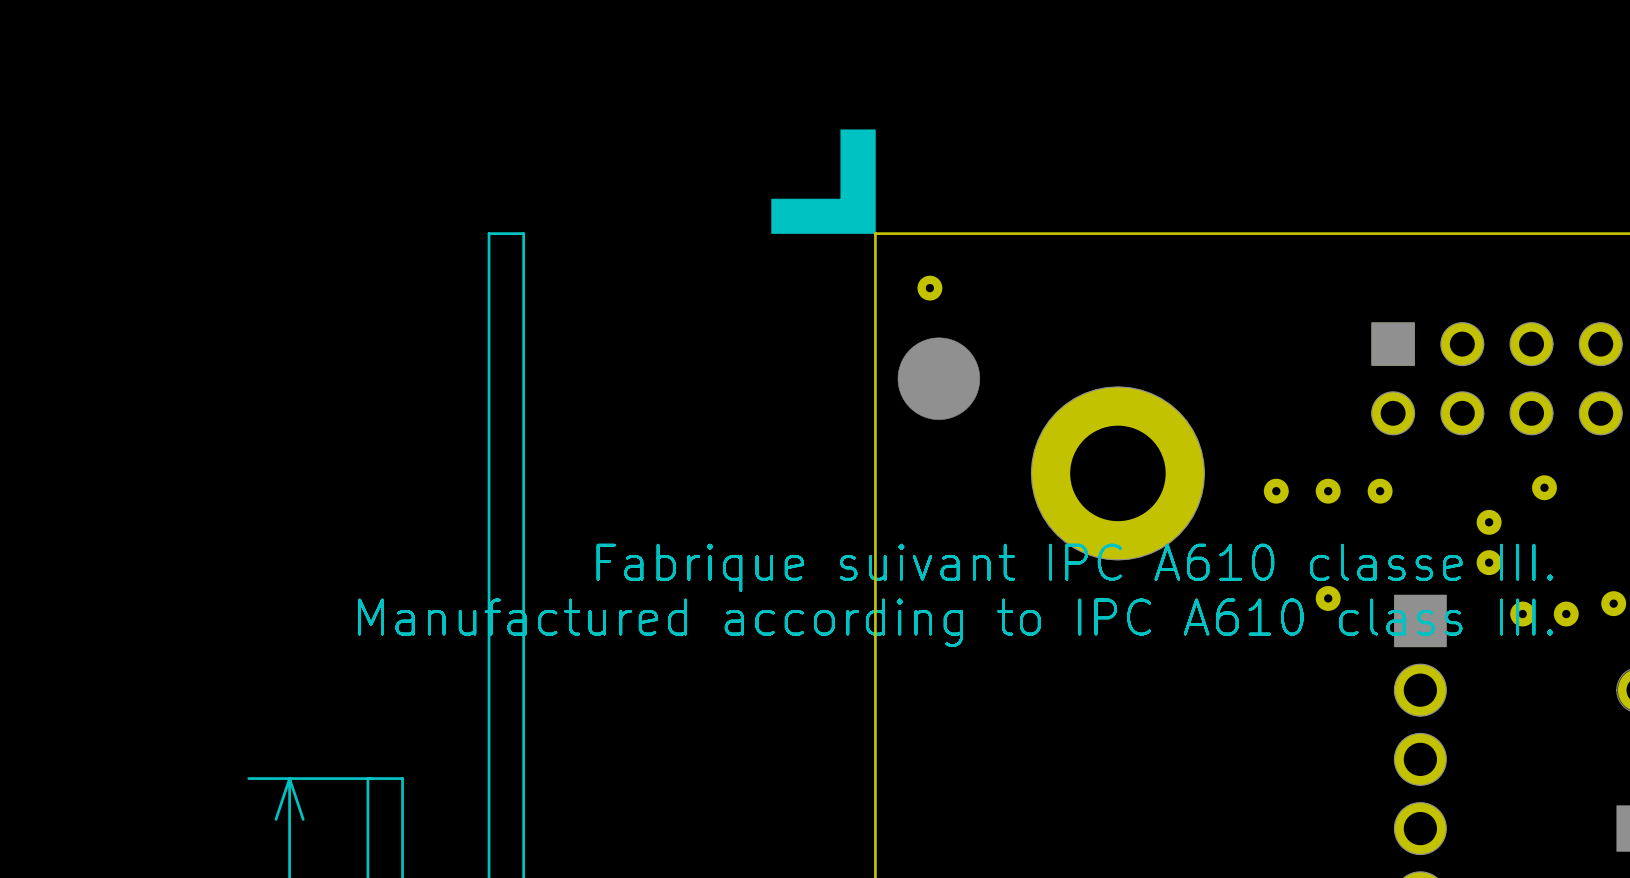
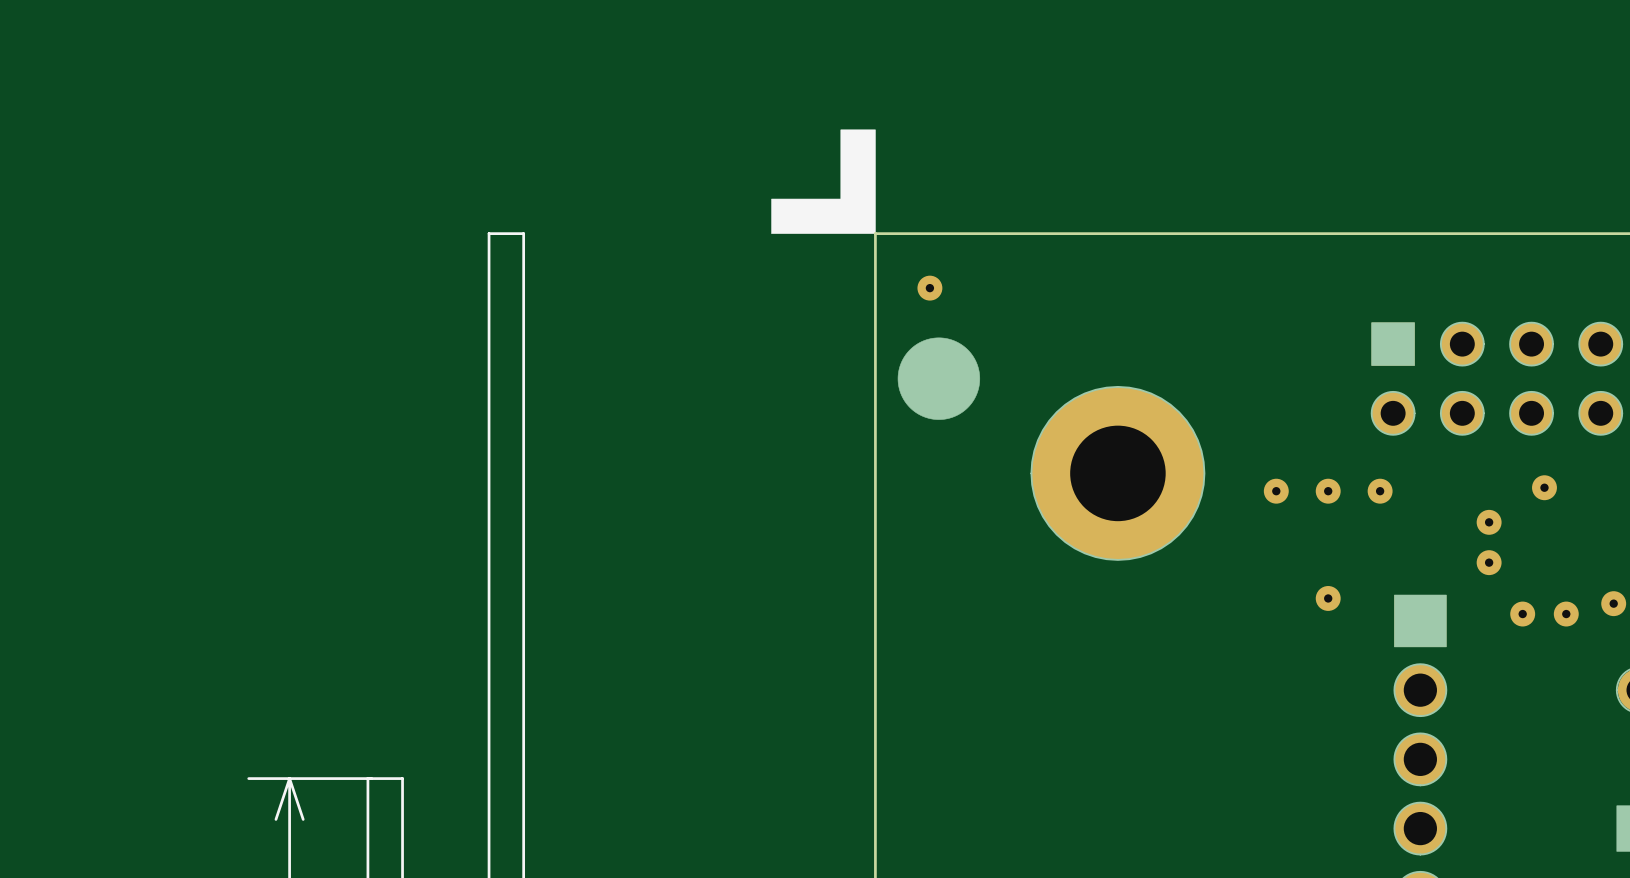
text: Fabrique suivant IPC A610 classe III. (1074, 567) -> none
text: Manufactured according to IPC A610 class III. (955, 622) -> none

